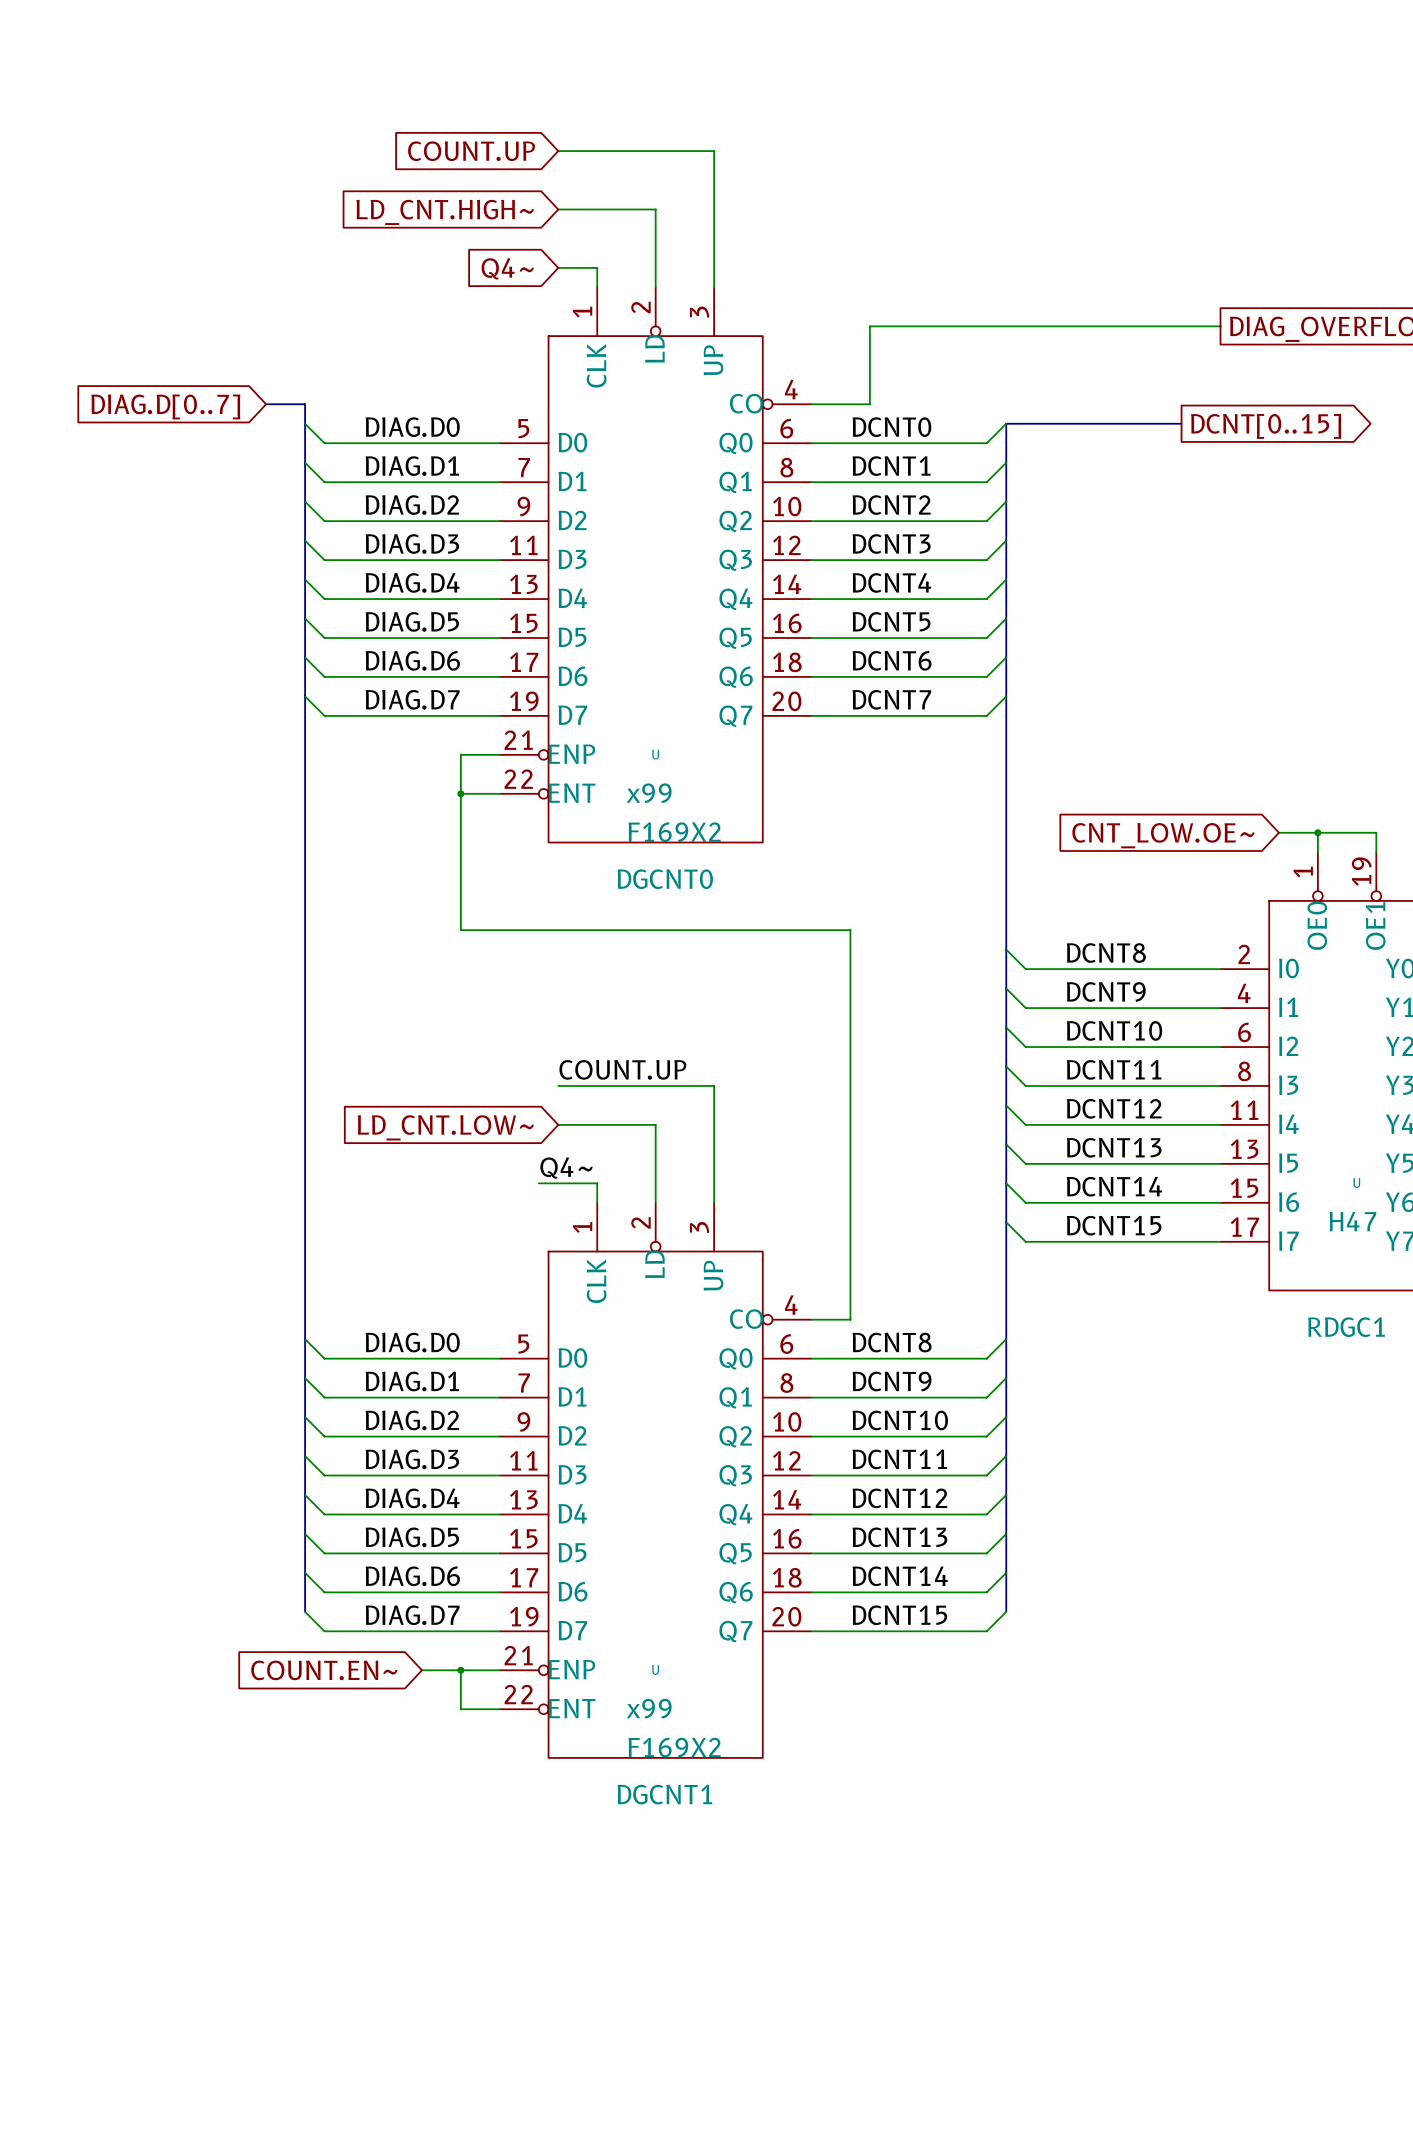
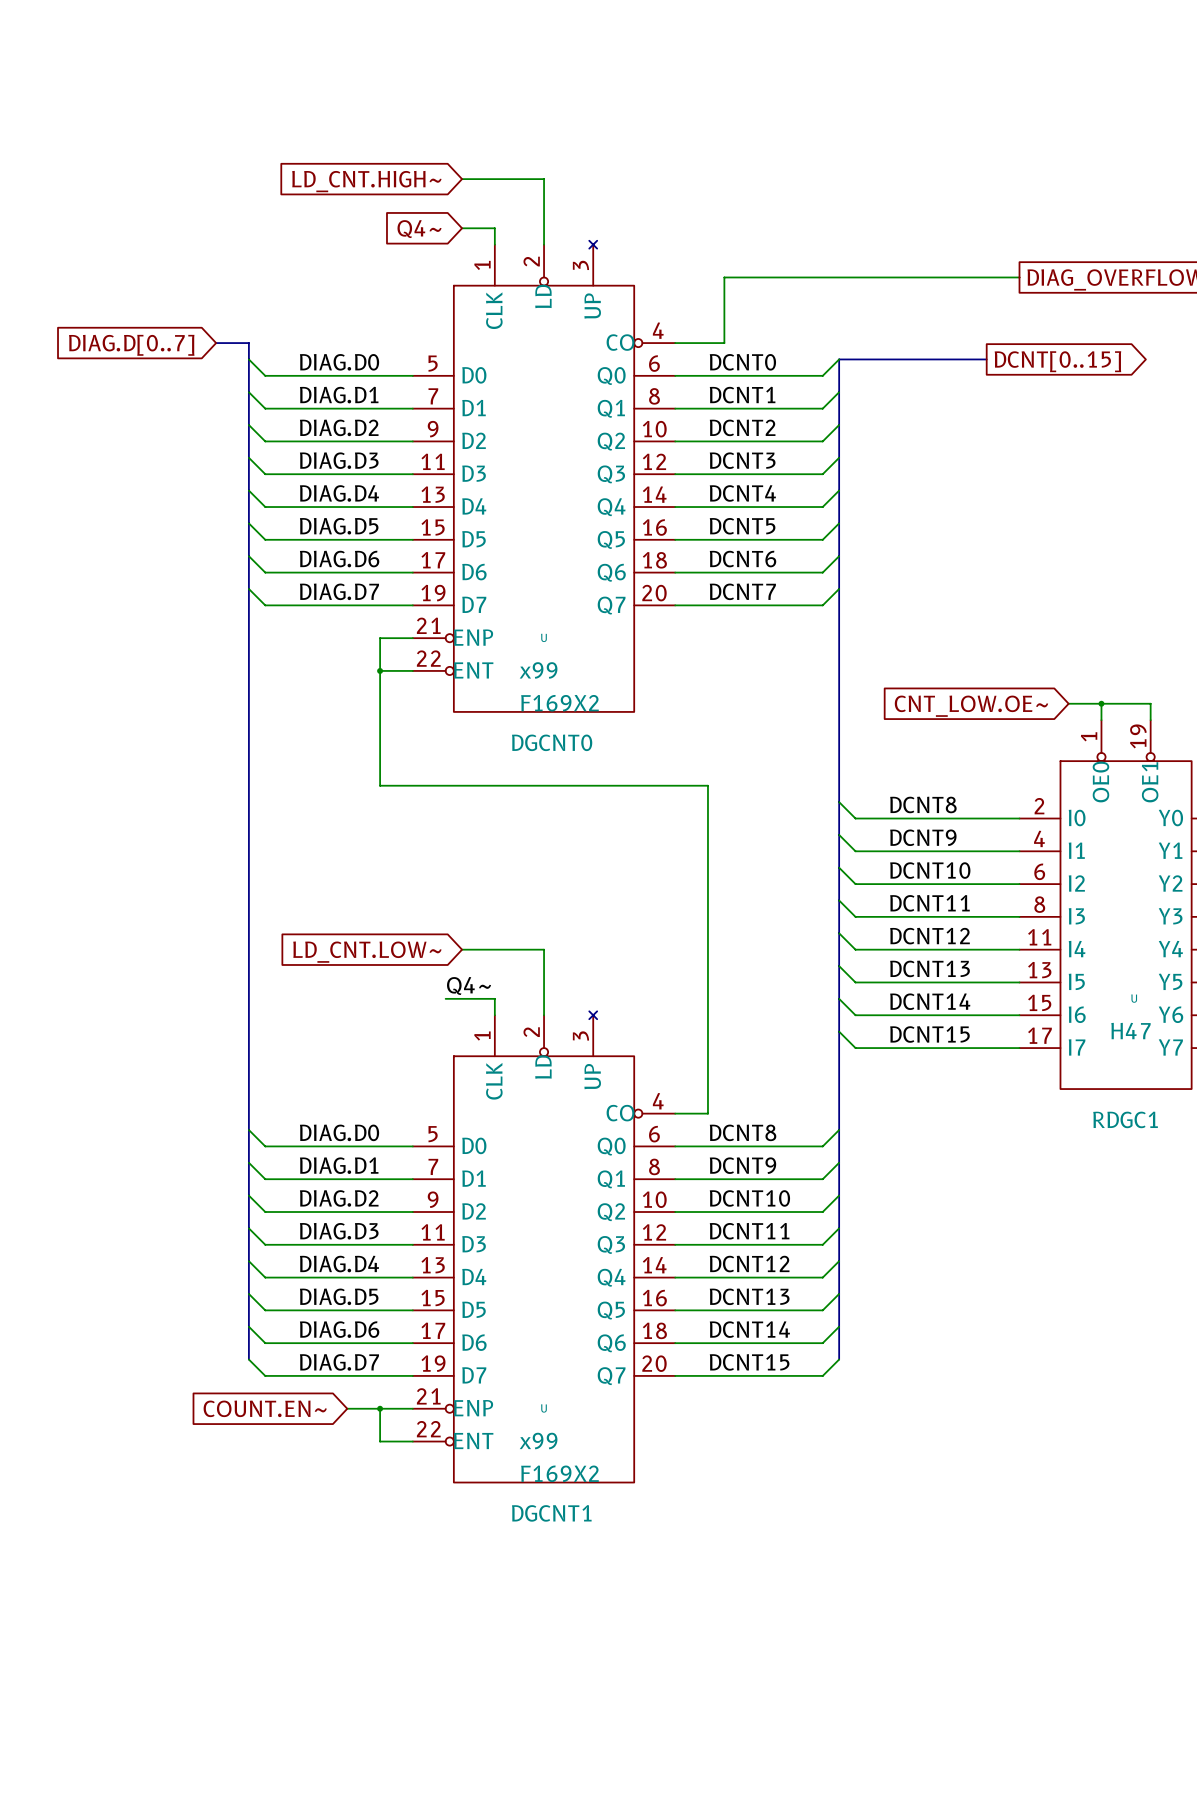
global label: COUNT.UP (471, 151) -> none
wire: (558, 151) (714, 151) (714, 287) -> none
no-connect mark: none -> (593, 244)
label: COUNT.UP (622, 1069) -> none
wire: (558, 1085) (714, 1085) (714, 1202) -> none
no-connect mark: none -> (593, 1015)

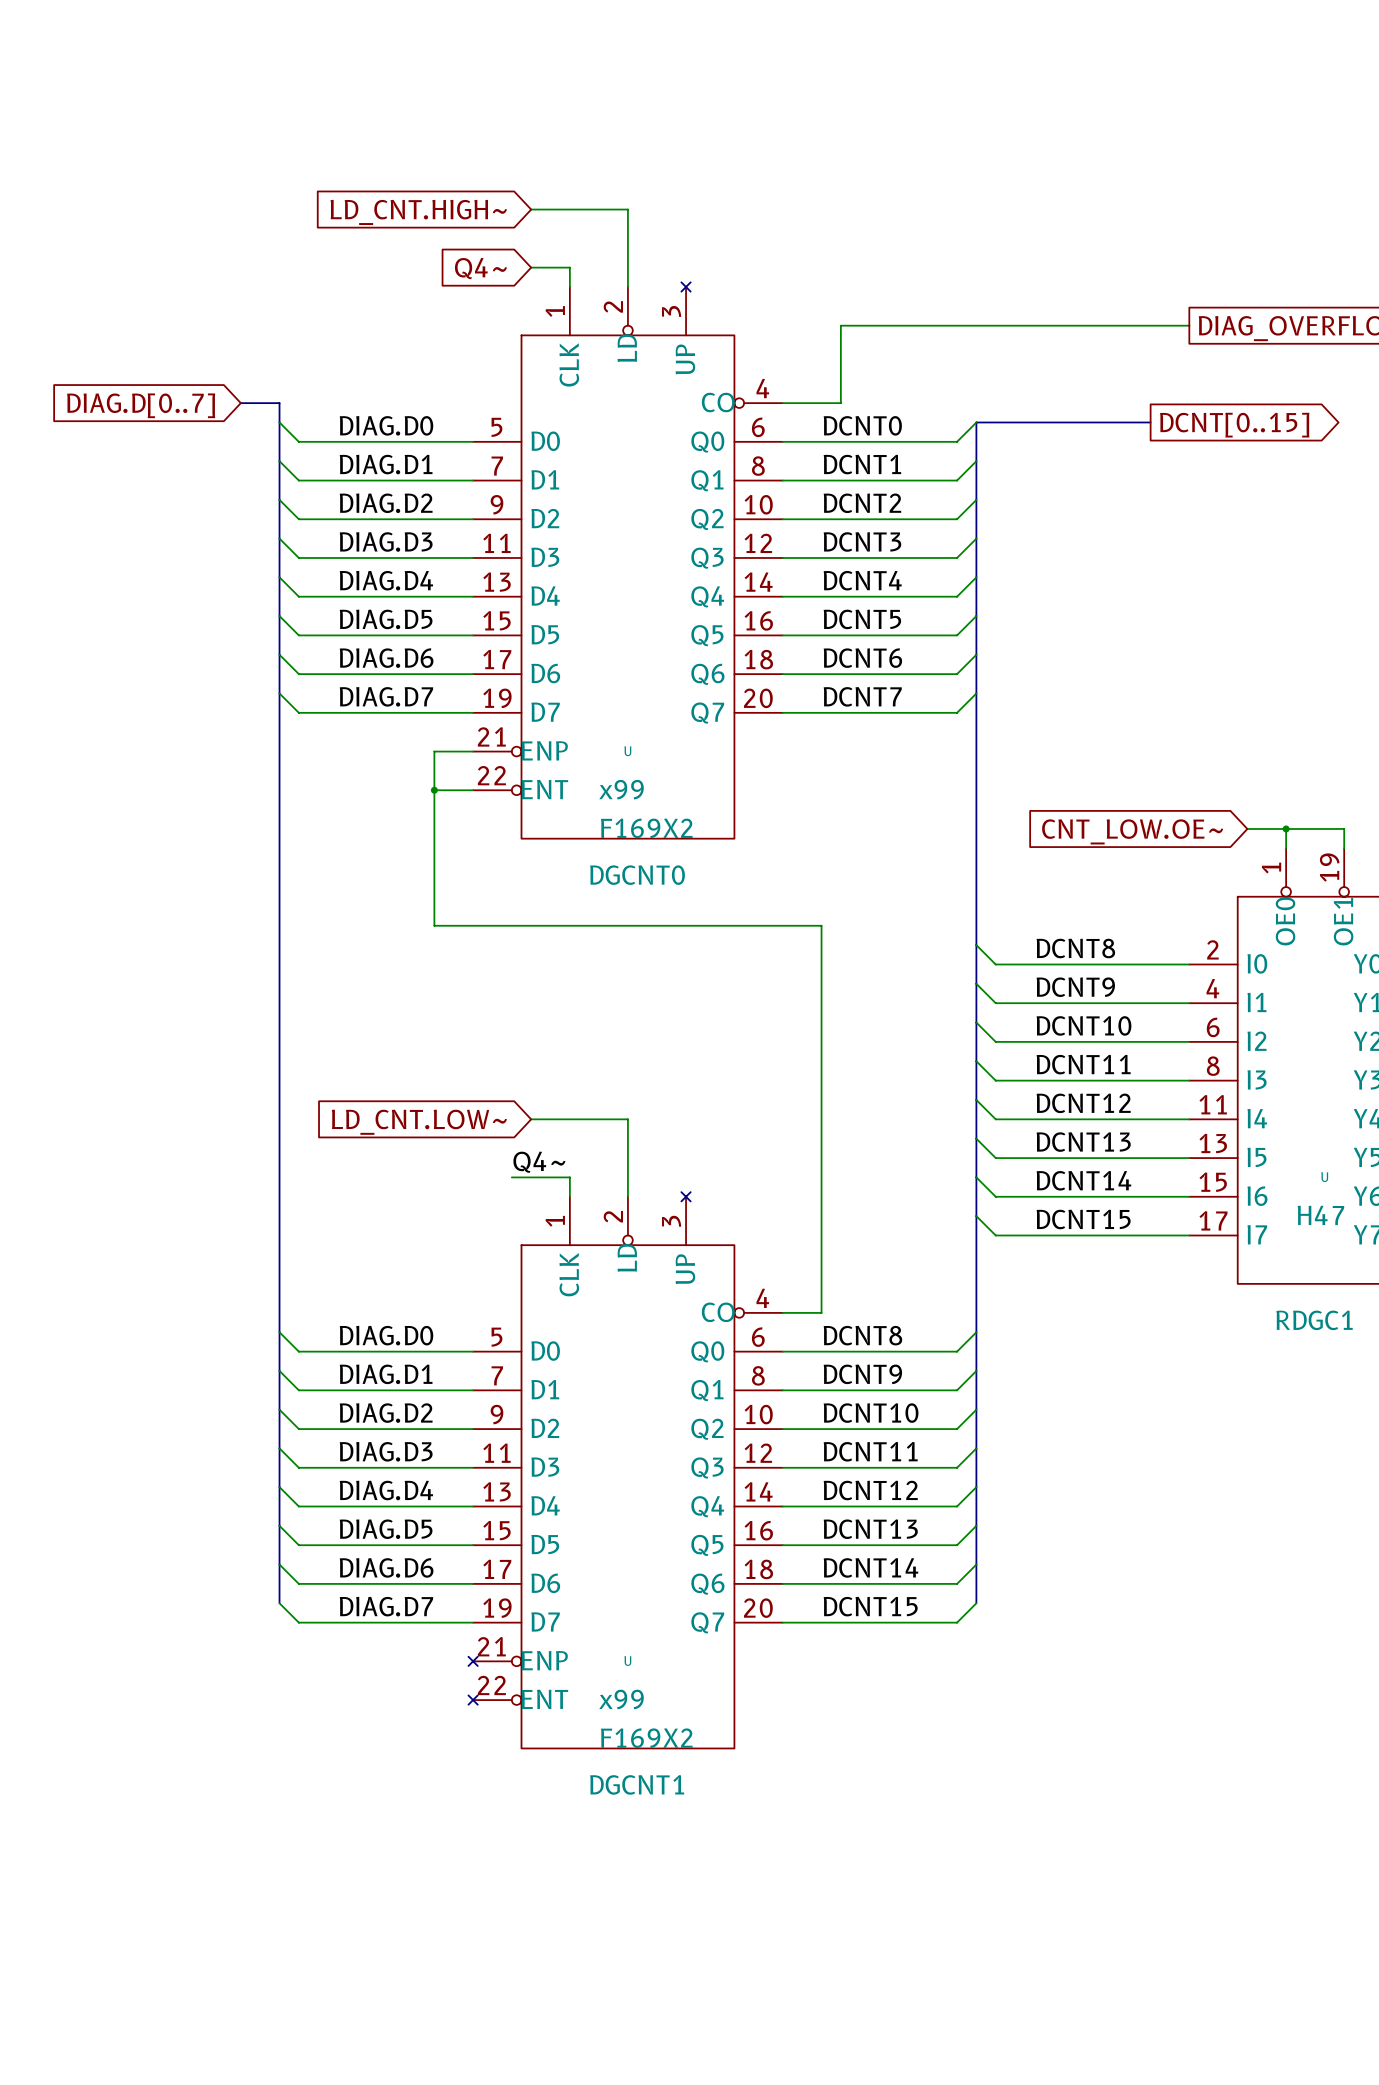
global label: COUNT.EN~ (265, 1408) -> none
wire: (347, 1408) (412, 1408) -> none
wire: (380, 1408) (380, 1441) (412, 1441) -> none
junction: (380, 1408) -> none
no-connect mark: none -> (473, 1661)
no-connect mark: none -> (473, 1700)

